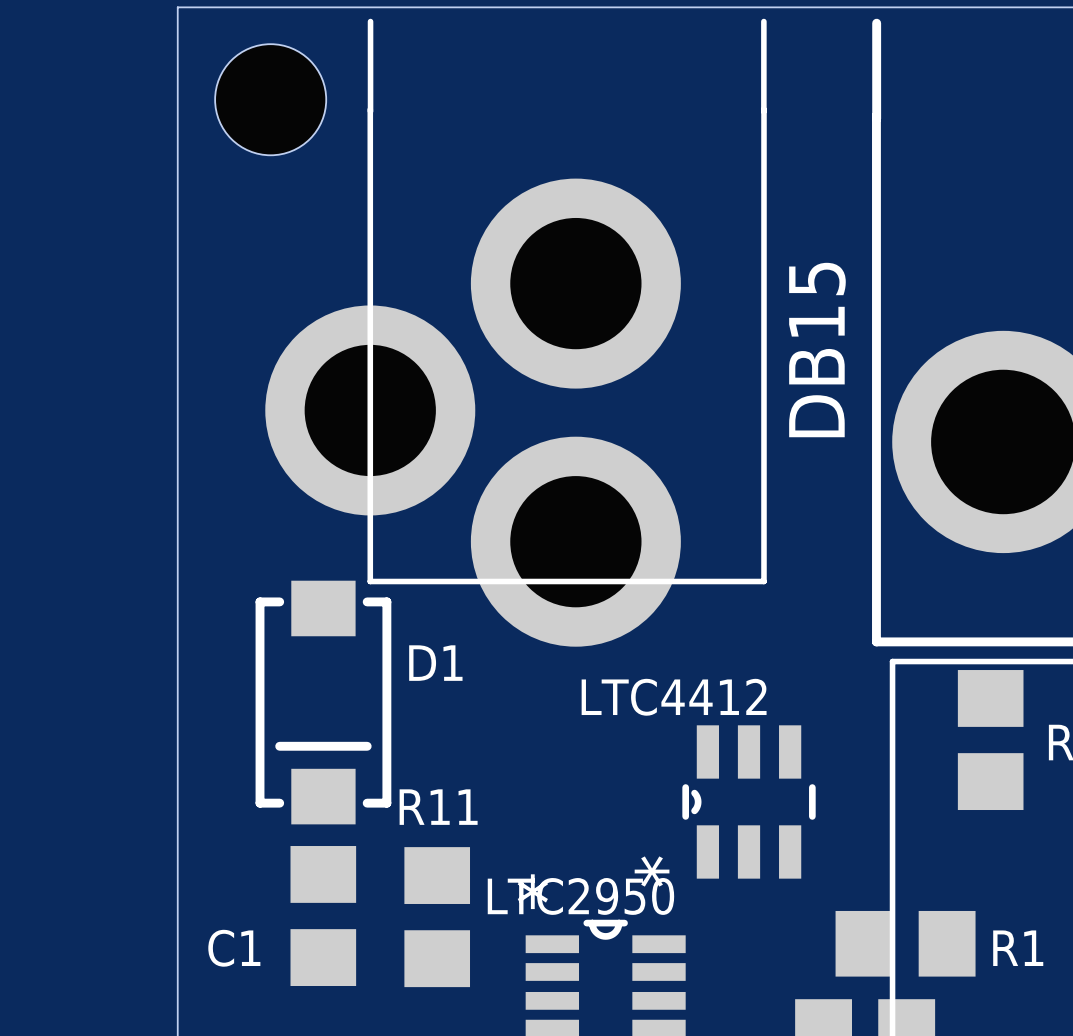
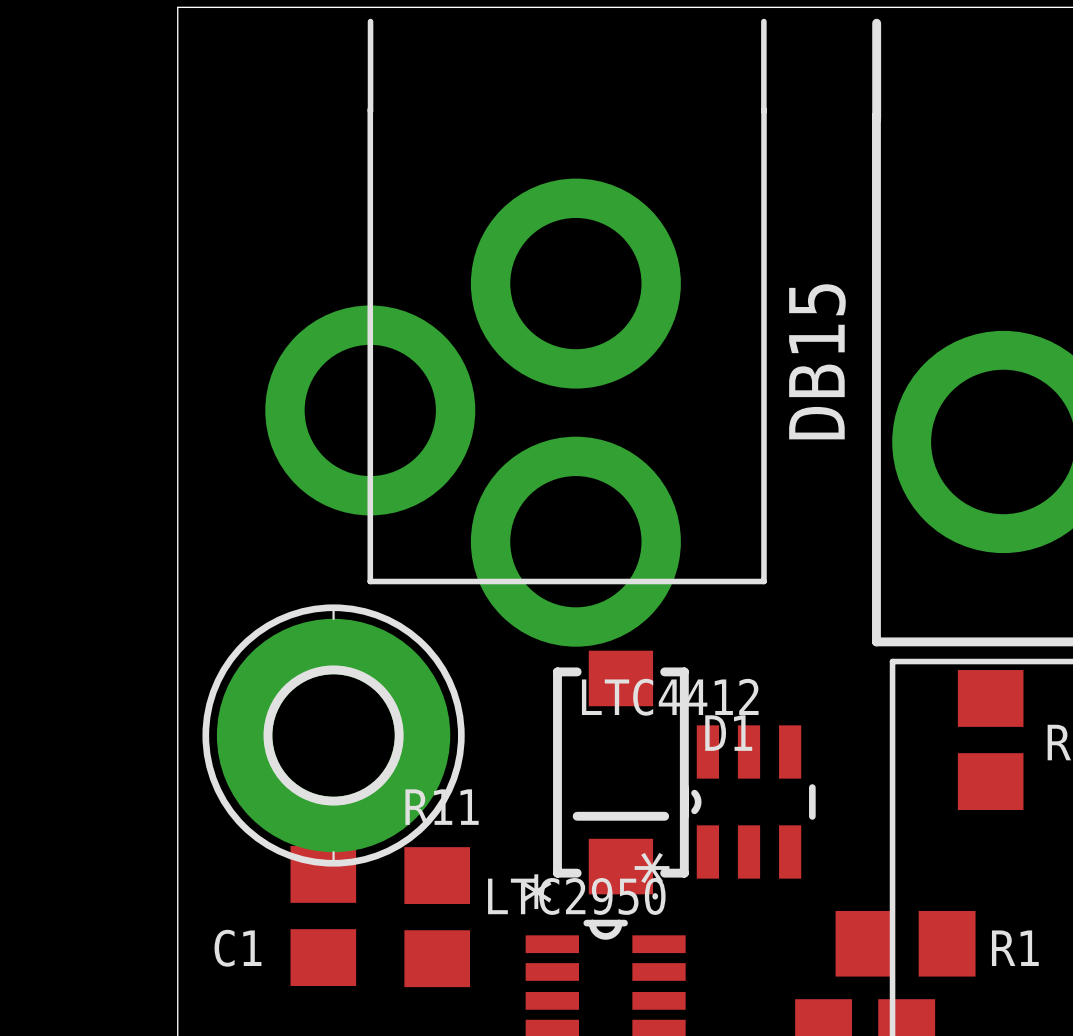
hole: (270, 99) -> none
D1 position: (323, 702) -> (620, 772)
part: none -> (333, 735)

